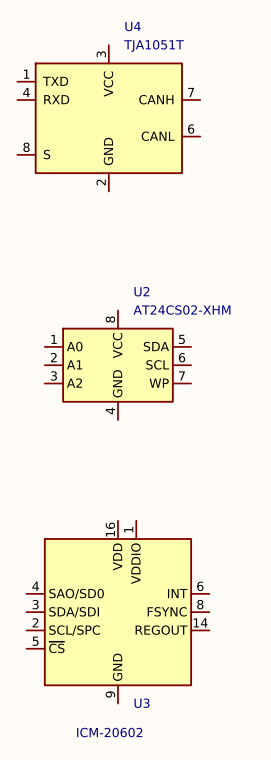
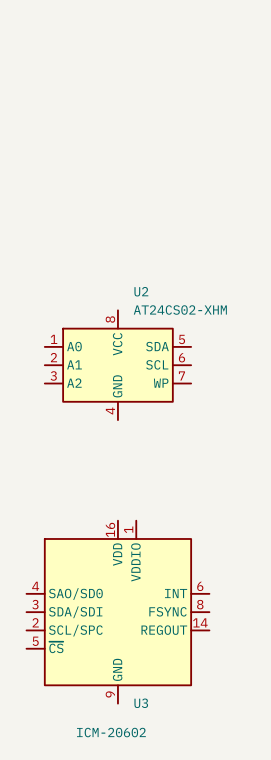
U4: TJA1051T (108, 118) -> none

